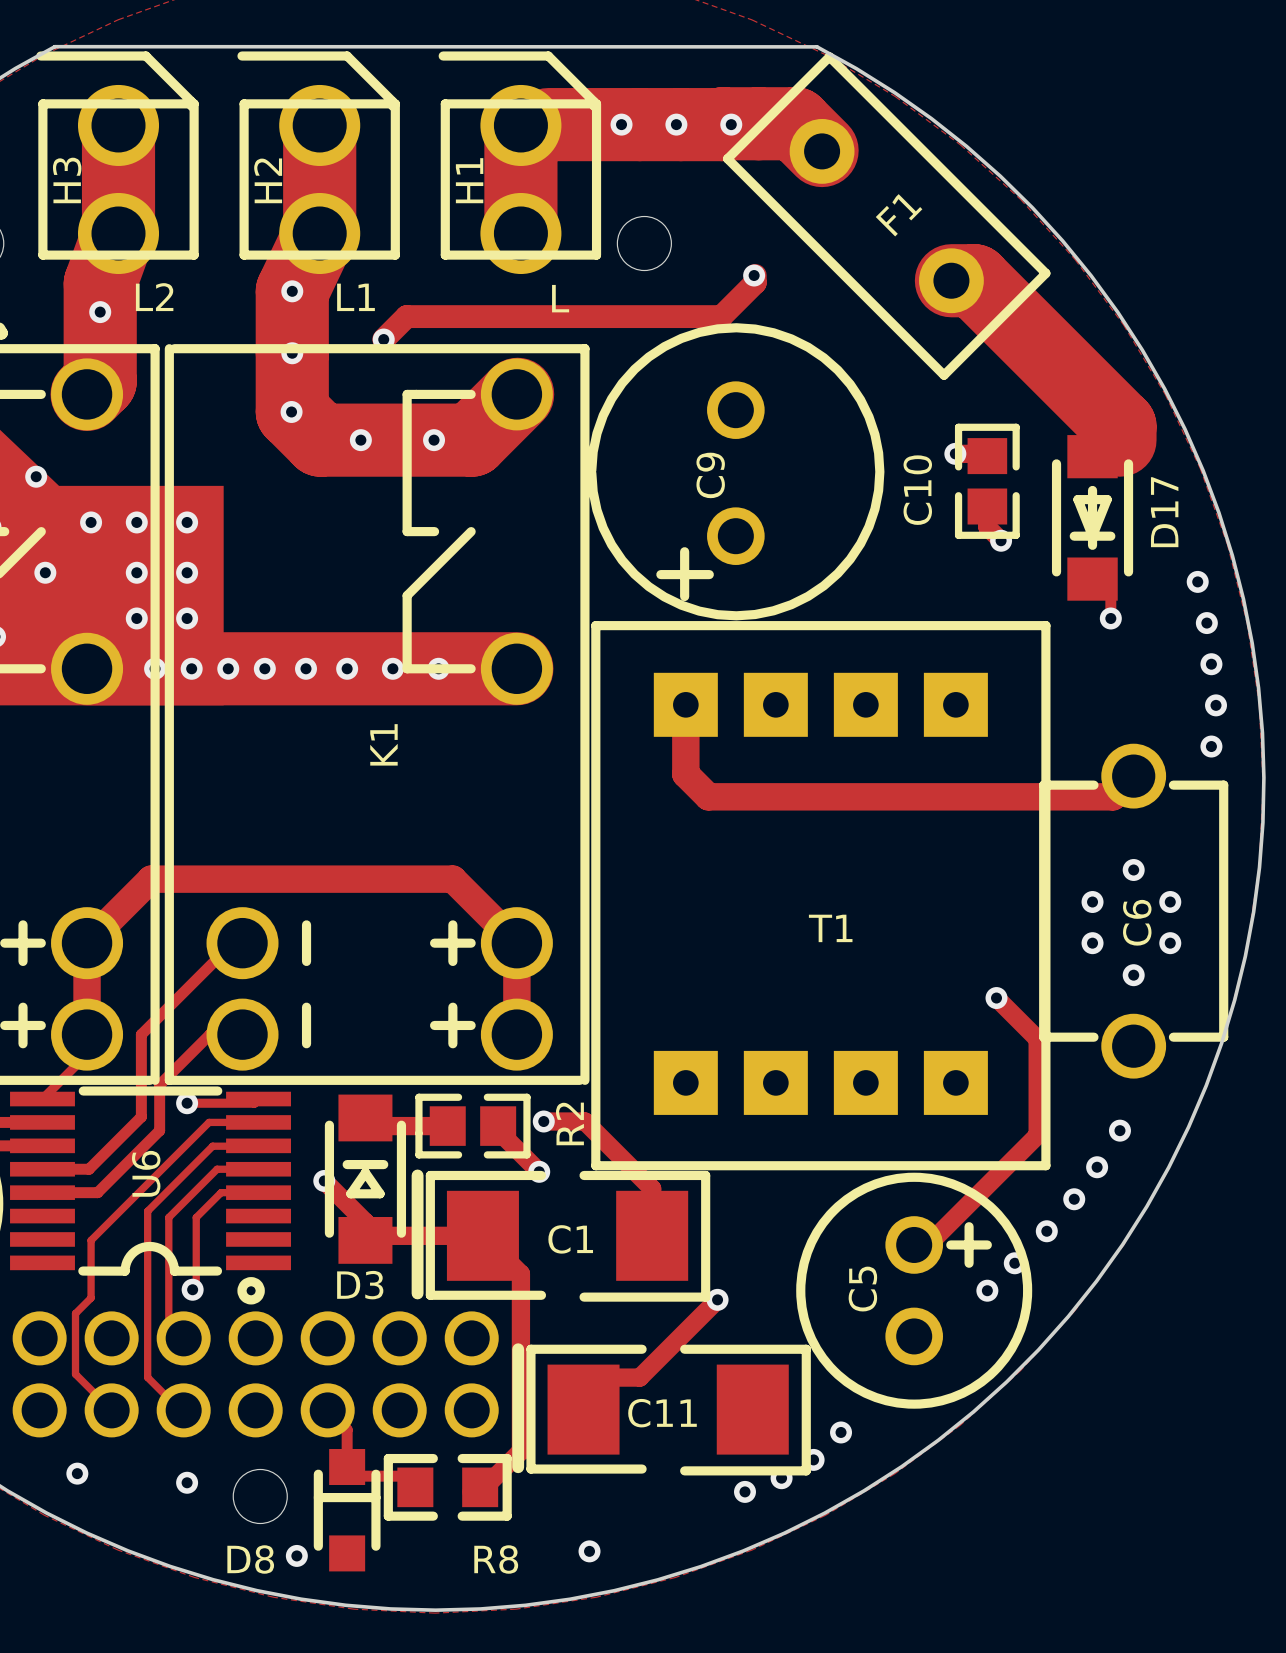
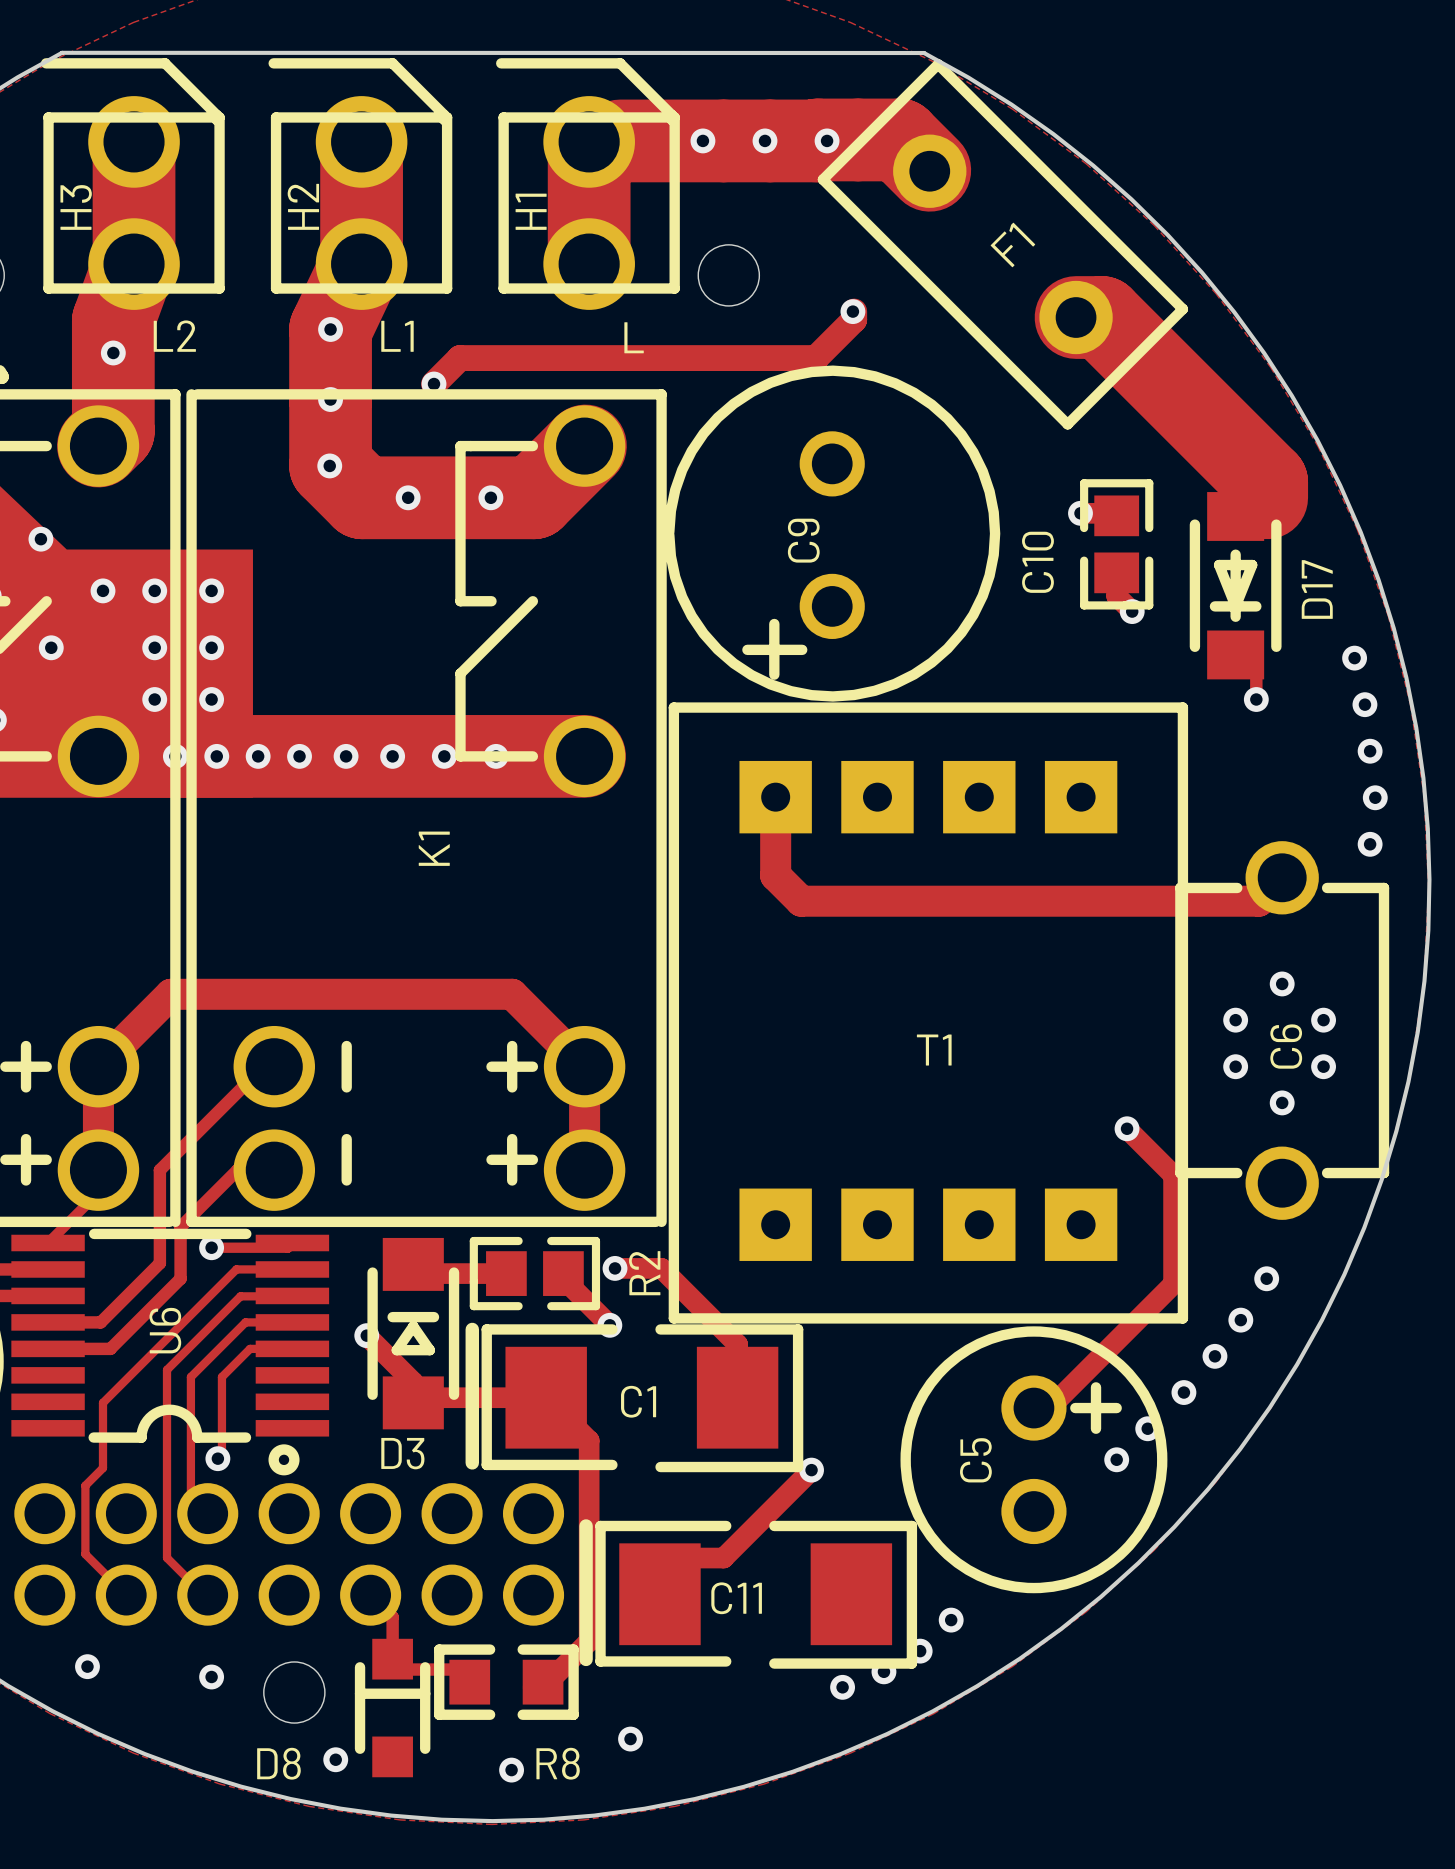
via position: (589, 1551) -> (630, 1739)
via: none -> (511, 1770)

